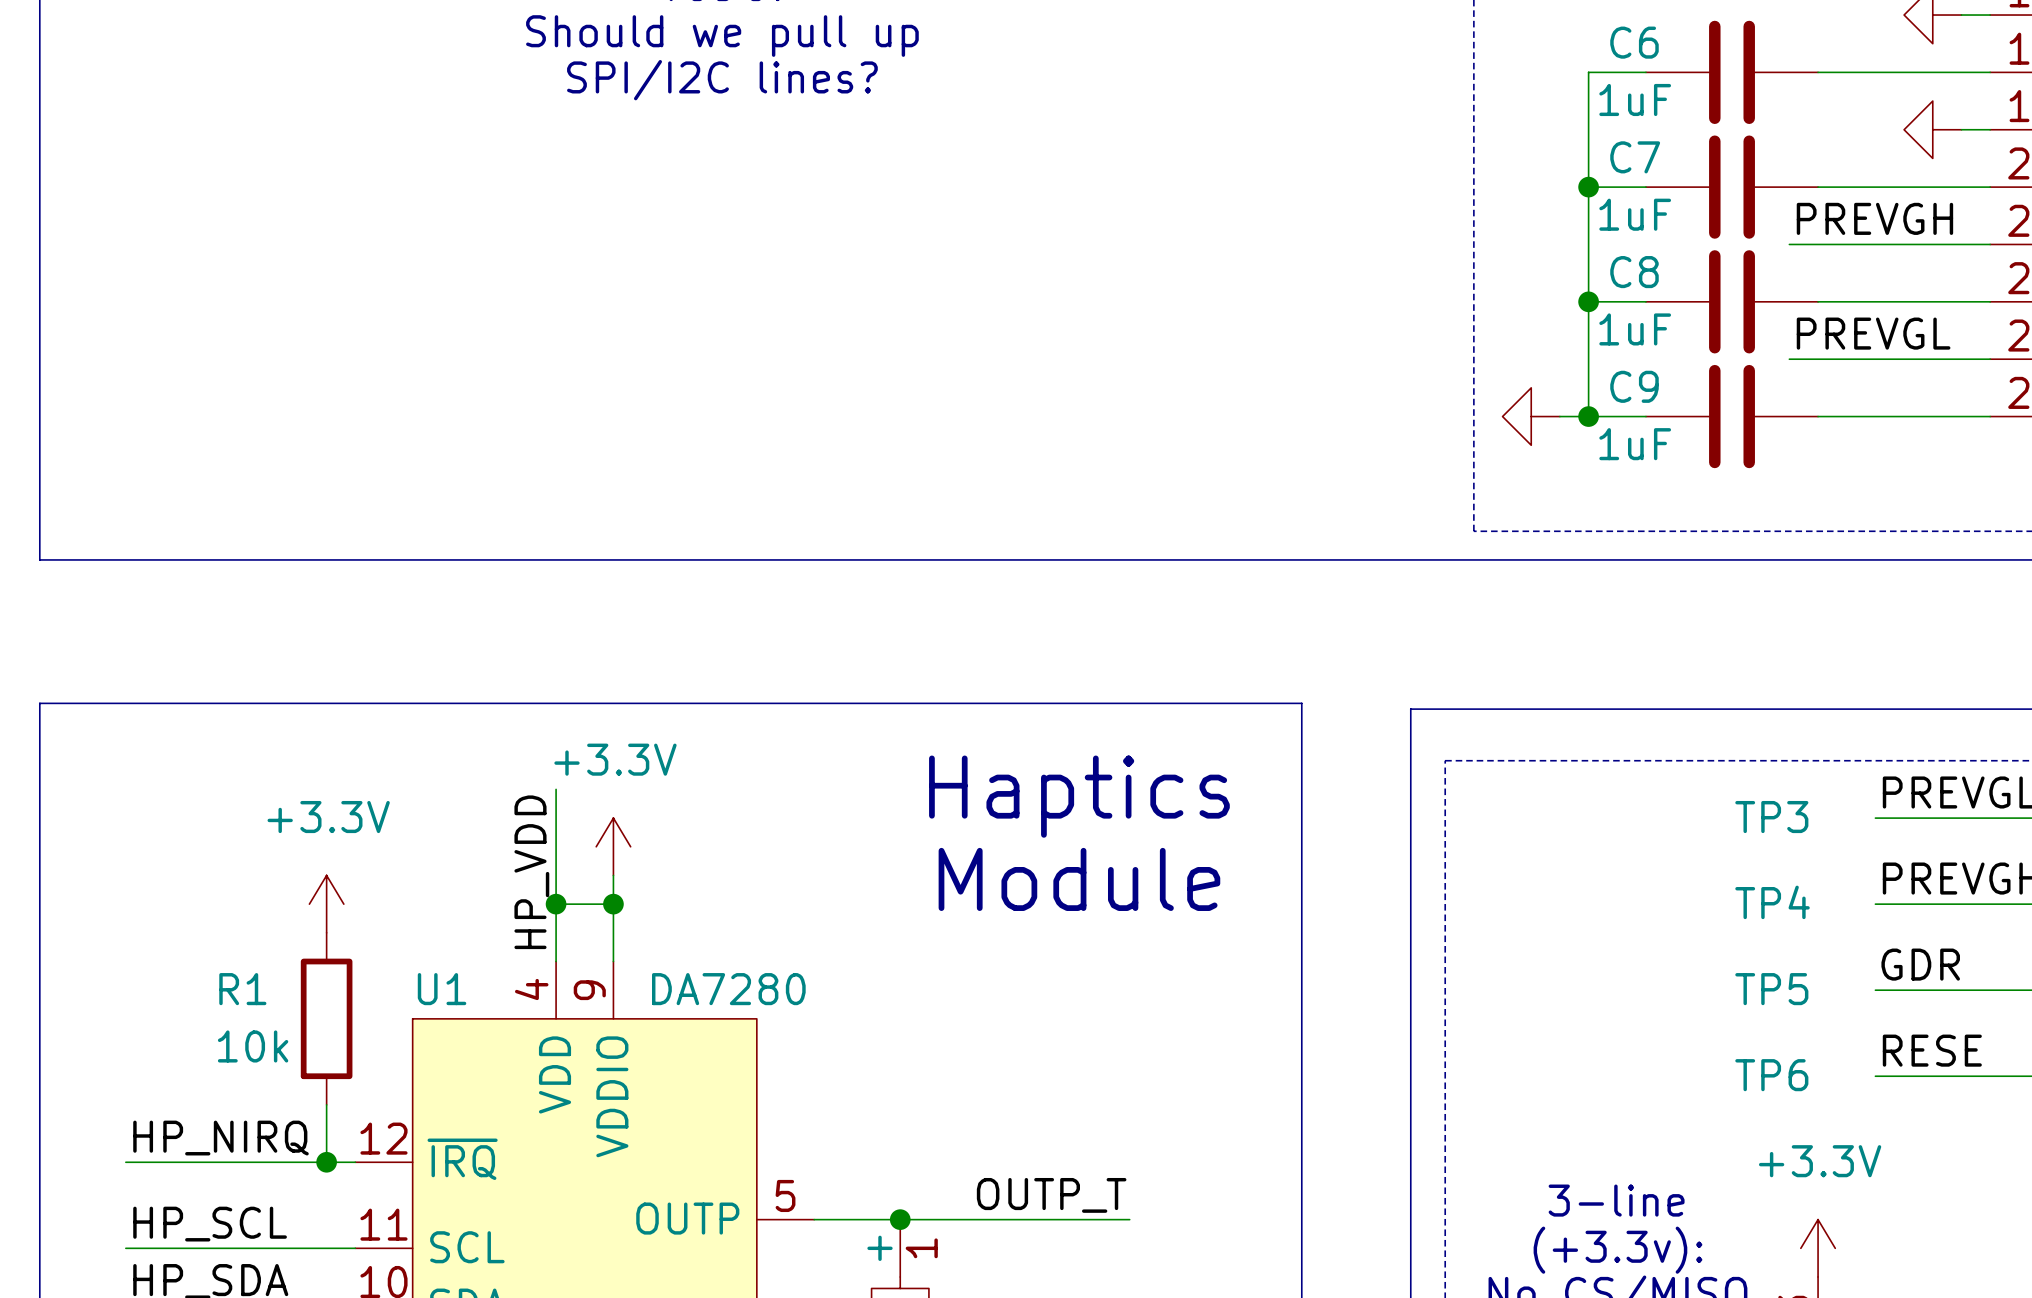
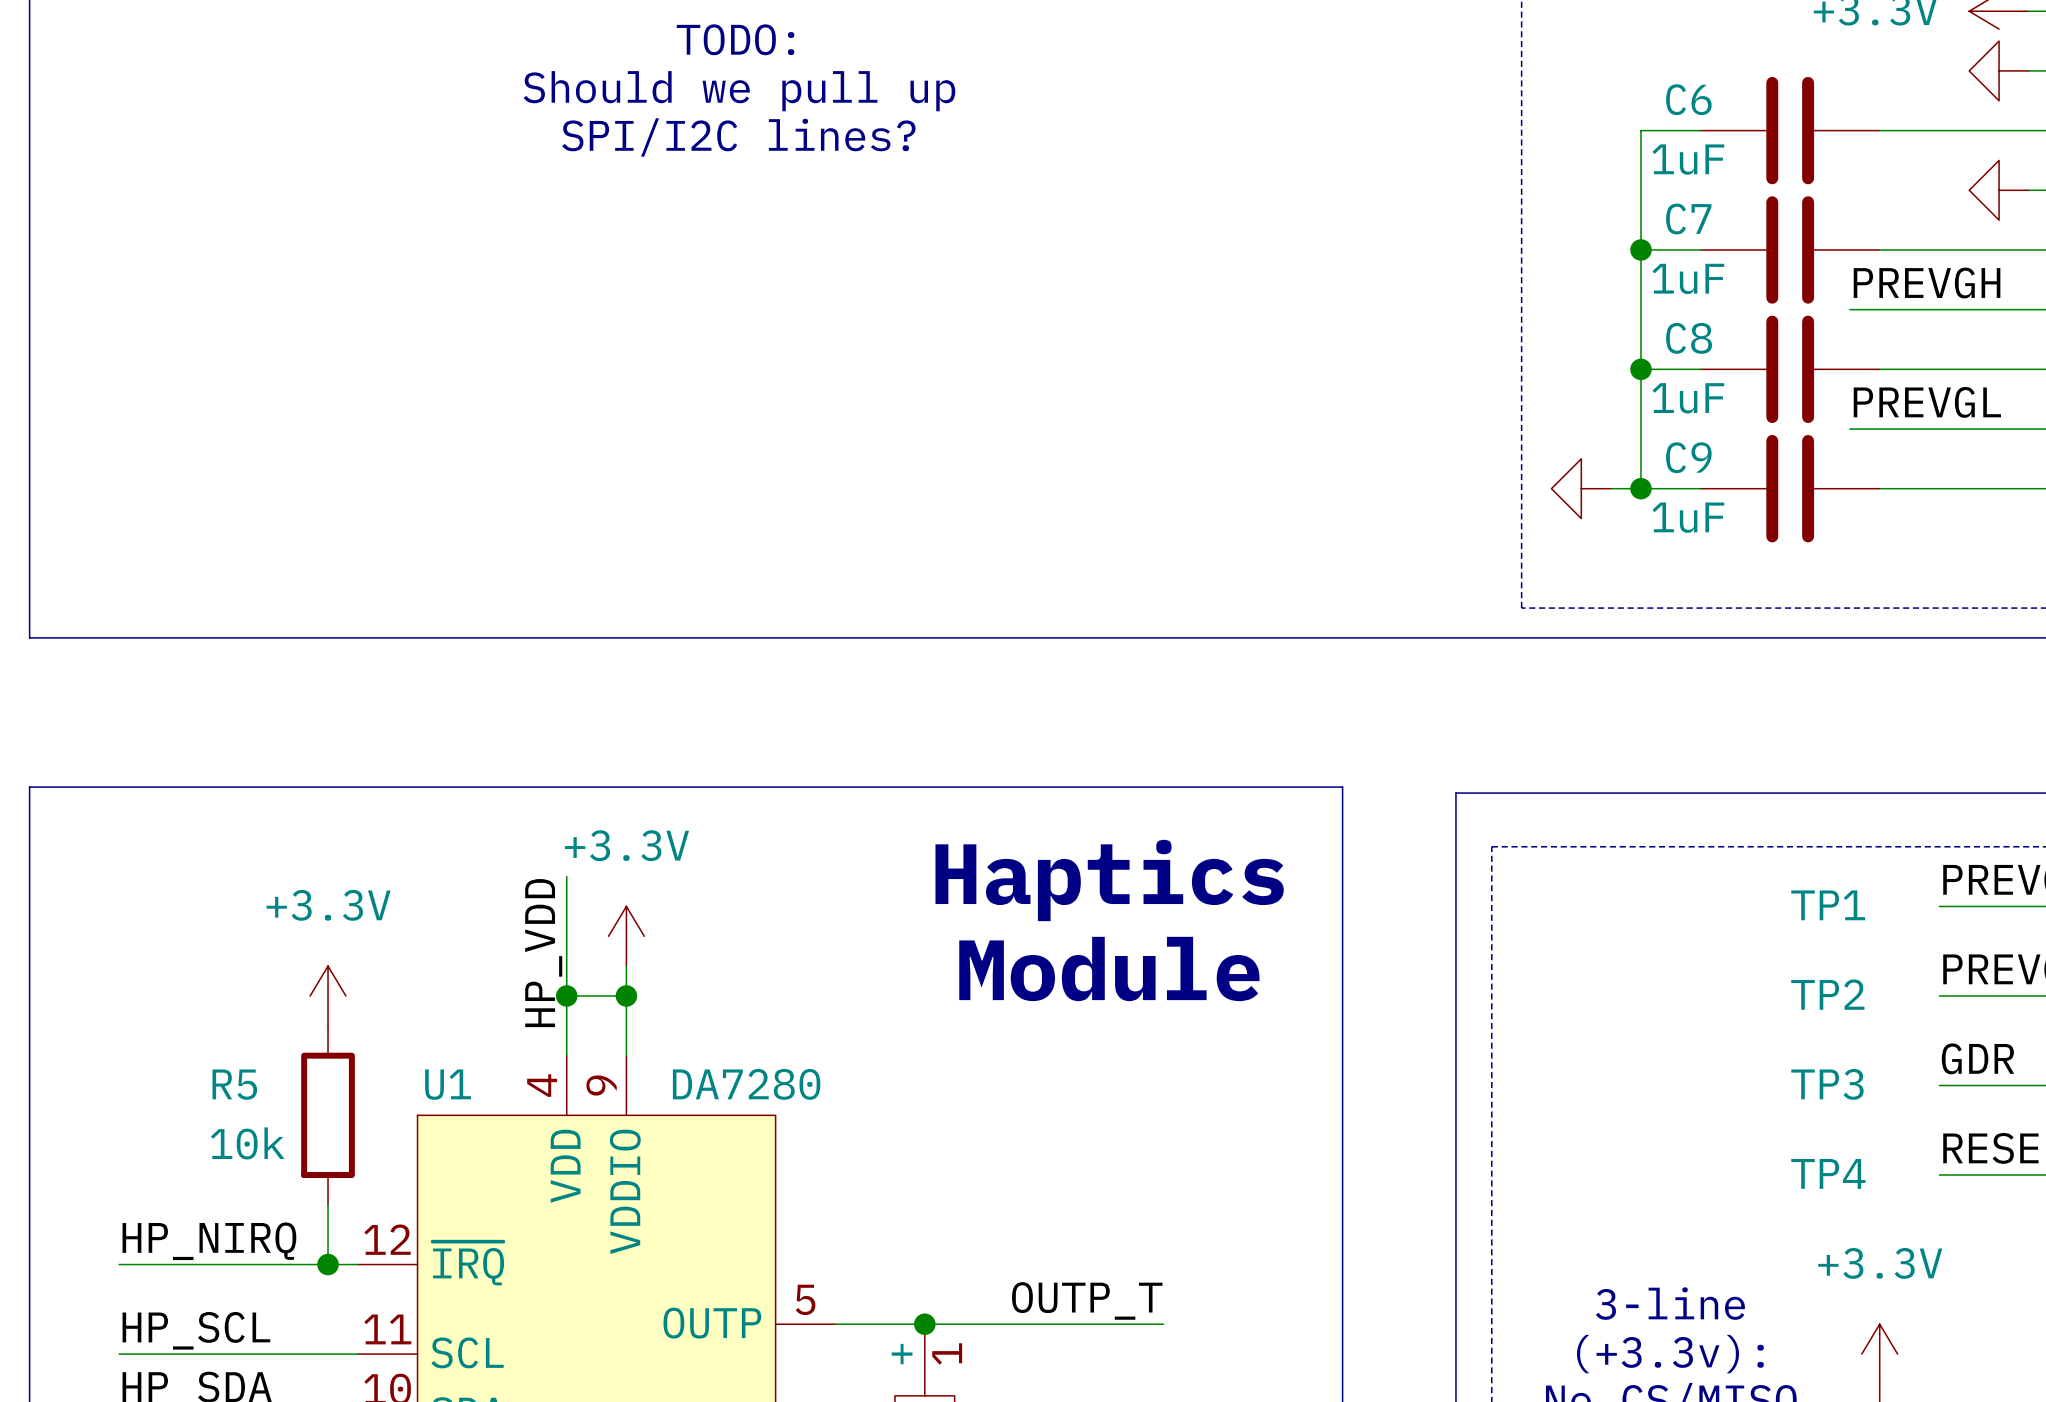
TP3 name: TP3 (1771, 817) -> TP1 (1828, 905)
TP4 name: TP4 (1772, 902) -> TP2 (1827, 994)
R1 name: R1 (242, 989) -> R5 (234, 1084)
TP5 name: TP5 (1771, 989) -> TP3 (1827, 1084)
TP6 name: TP6 (1771, 1075) -> TP4 (1828, 1173)

